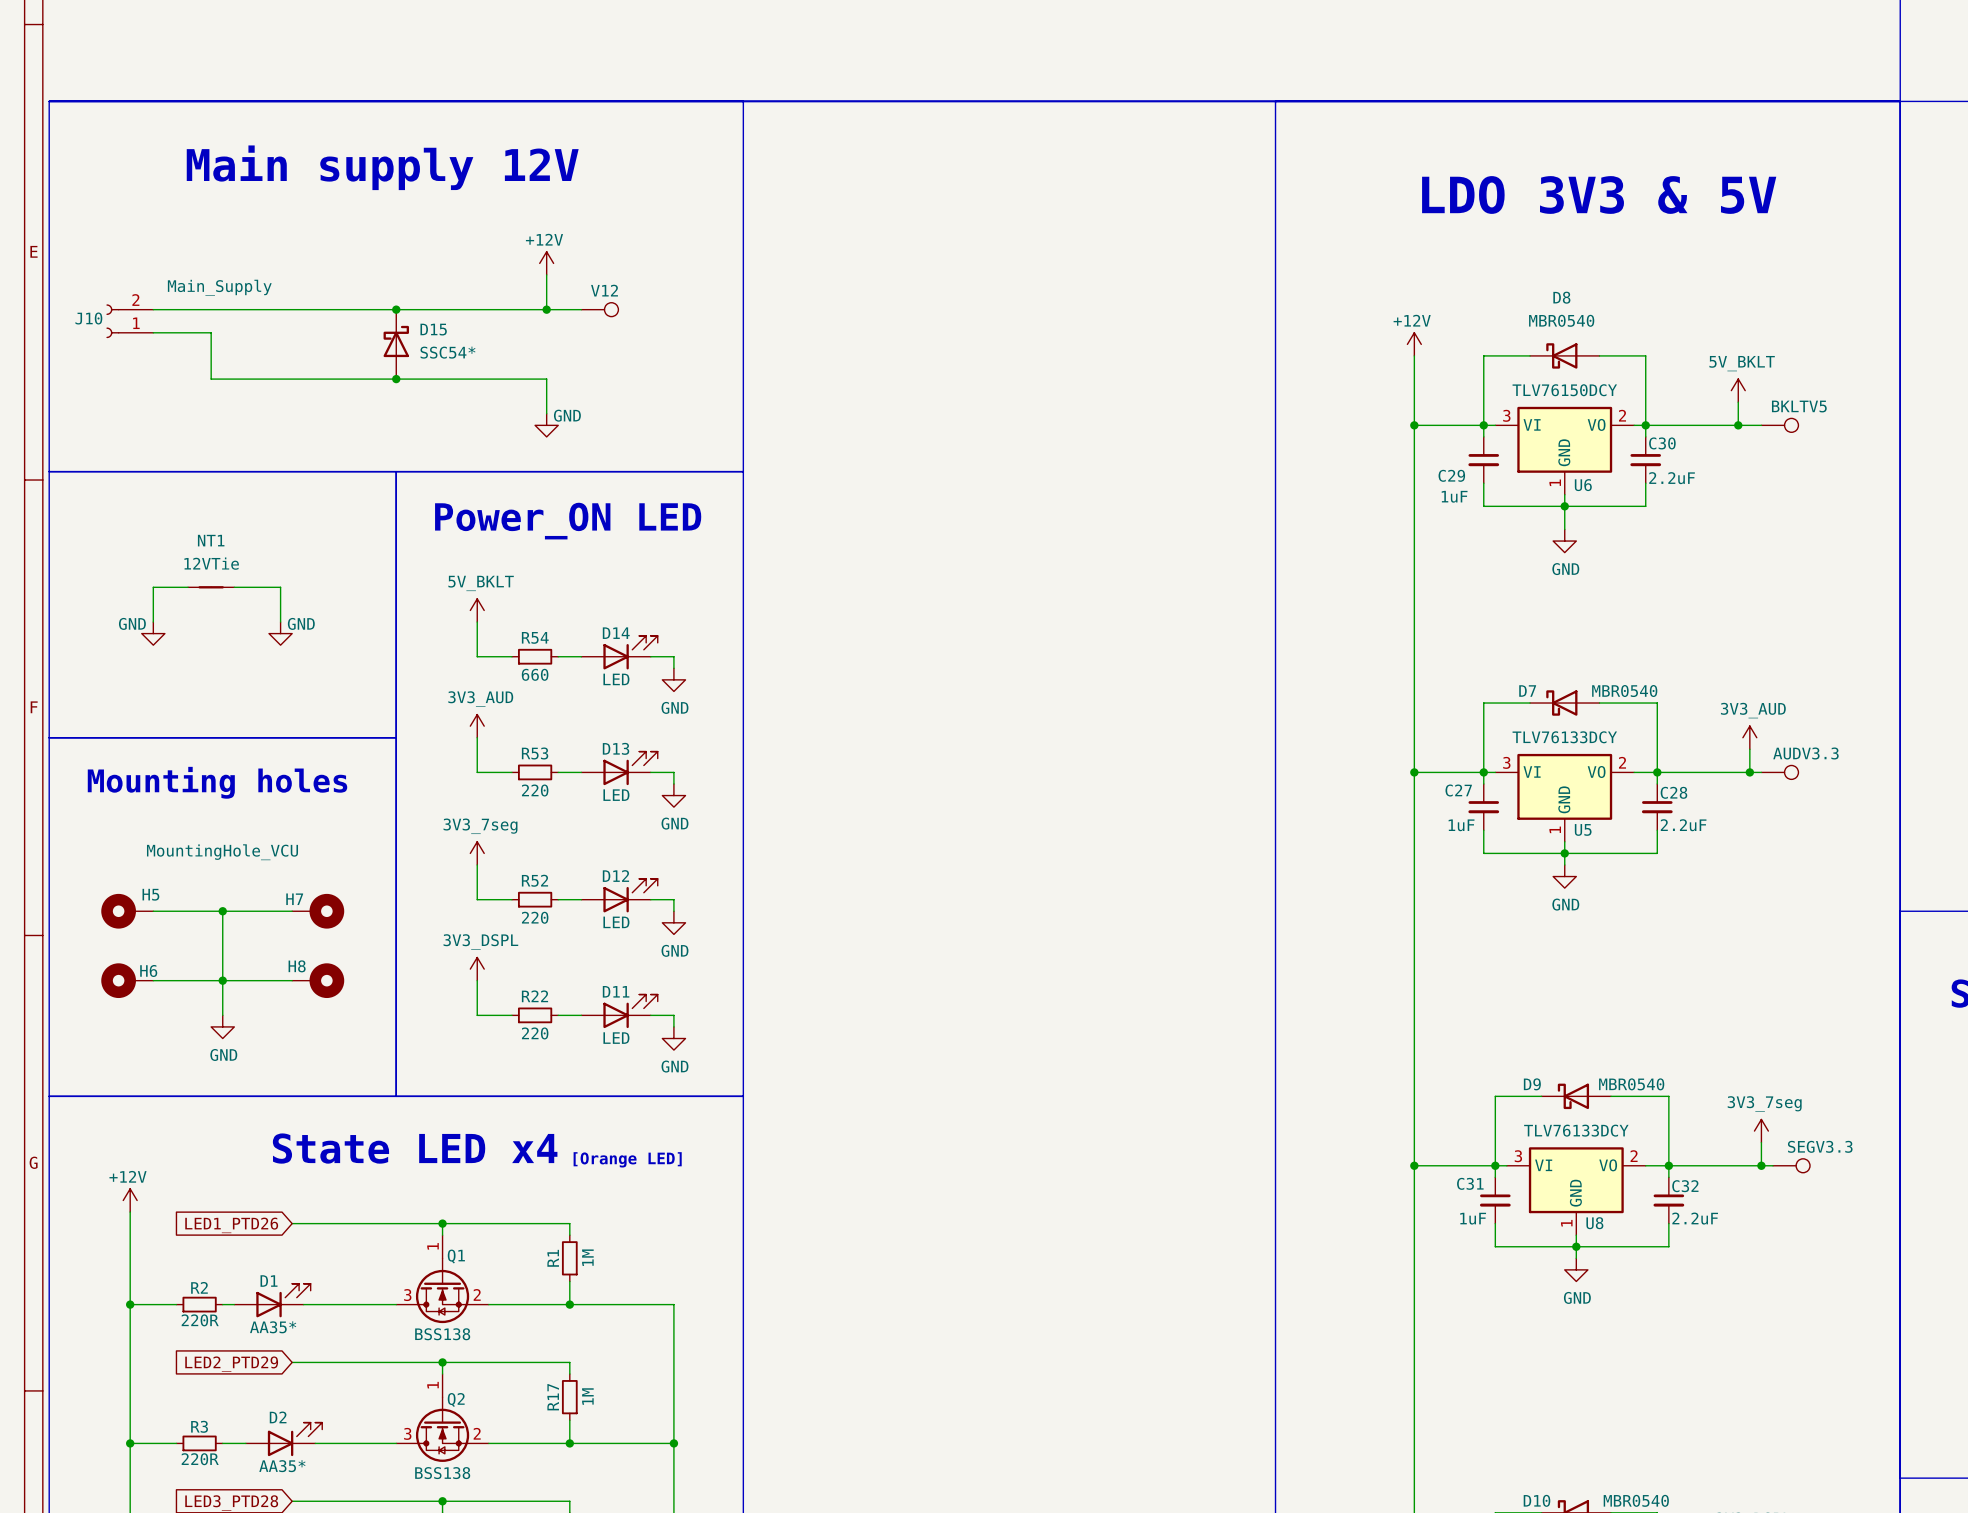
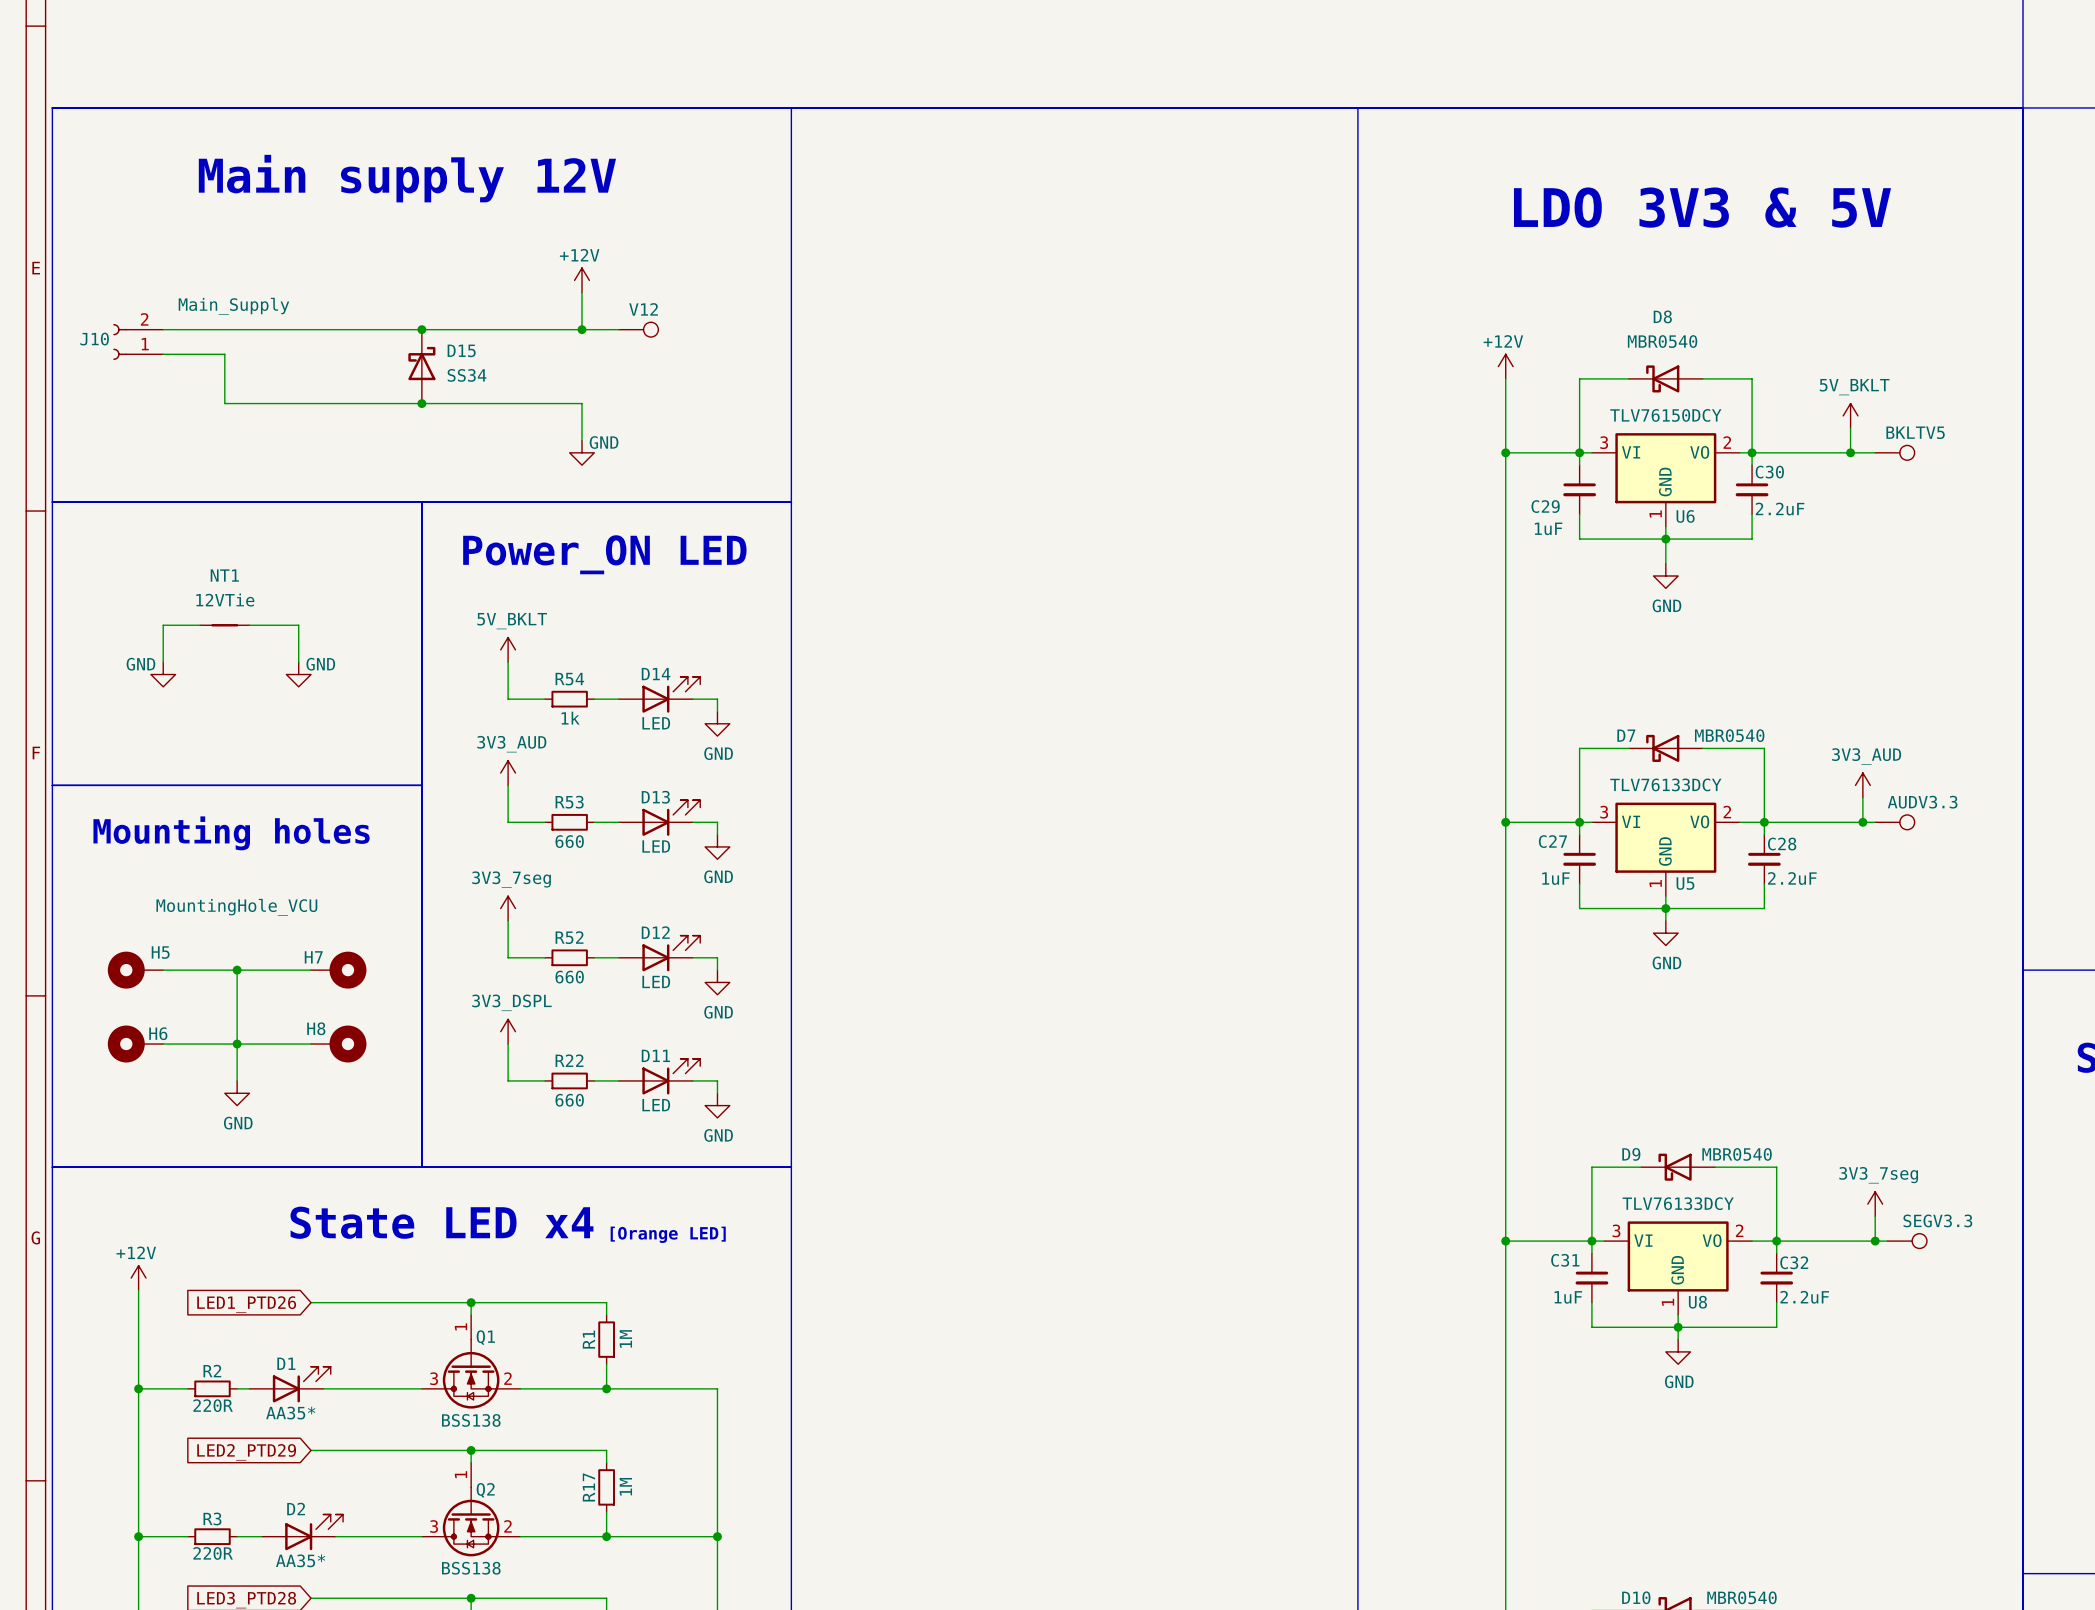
D15 value: SSC54* (447, 352) -> SS34 (467, 375)
R54 value: 660 (535, 674) -> 1k (570, 718)
R53 value: 220 (535, 790) -> 660 (569, 841)
R52 value: 220 (535, 917) -> 660 (569, 977)
R22 value: 220 (535, 1033) -> 660 (569, 1100)

